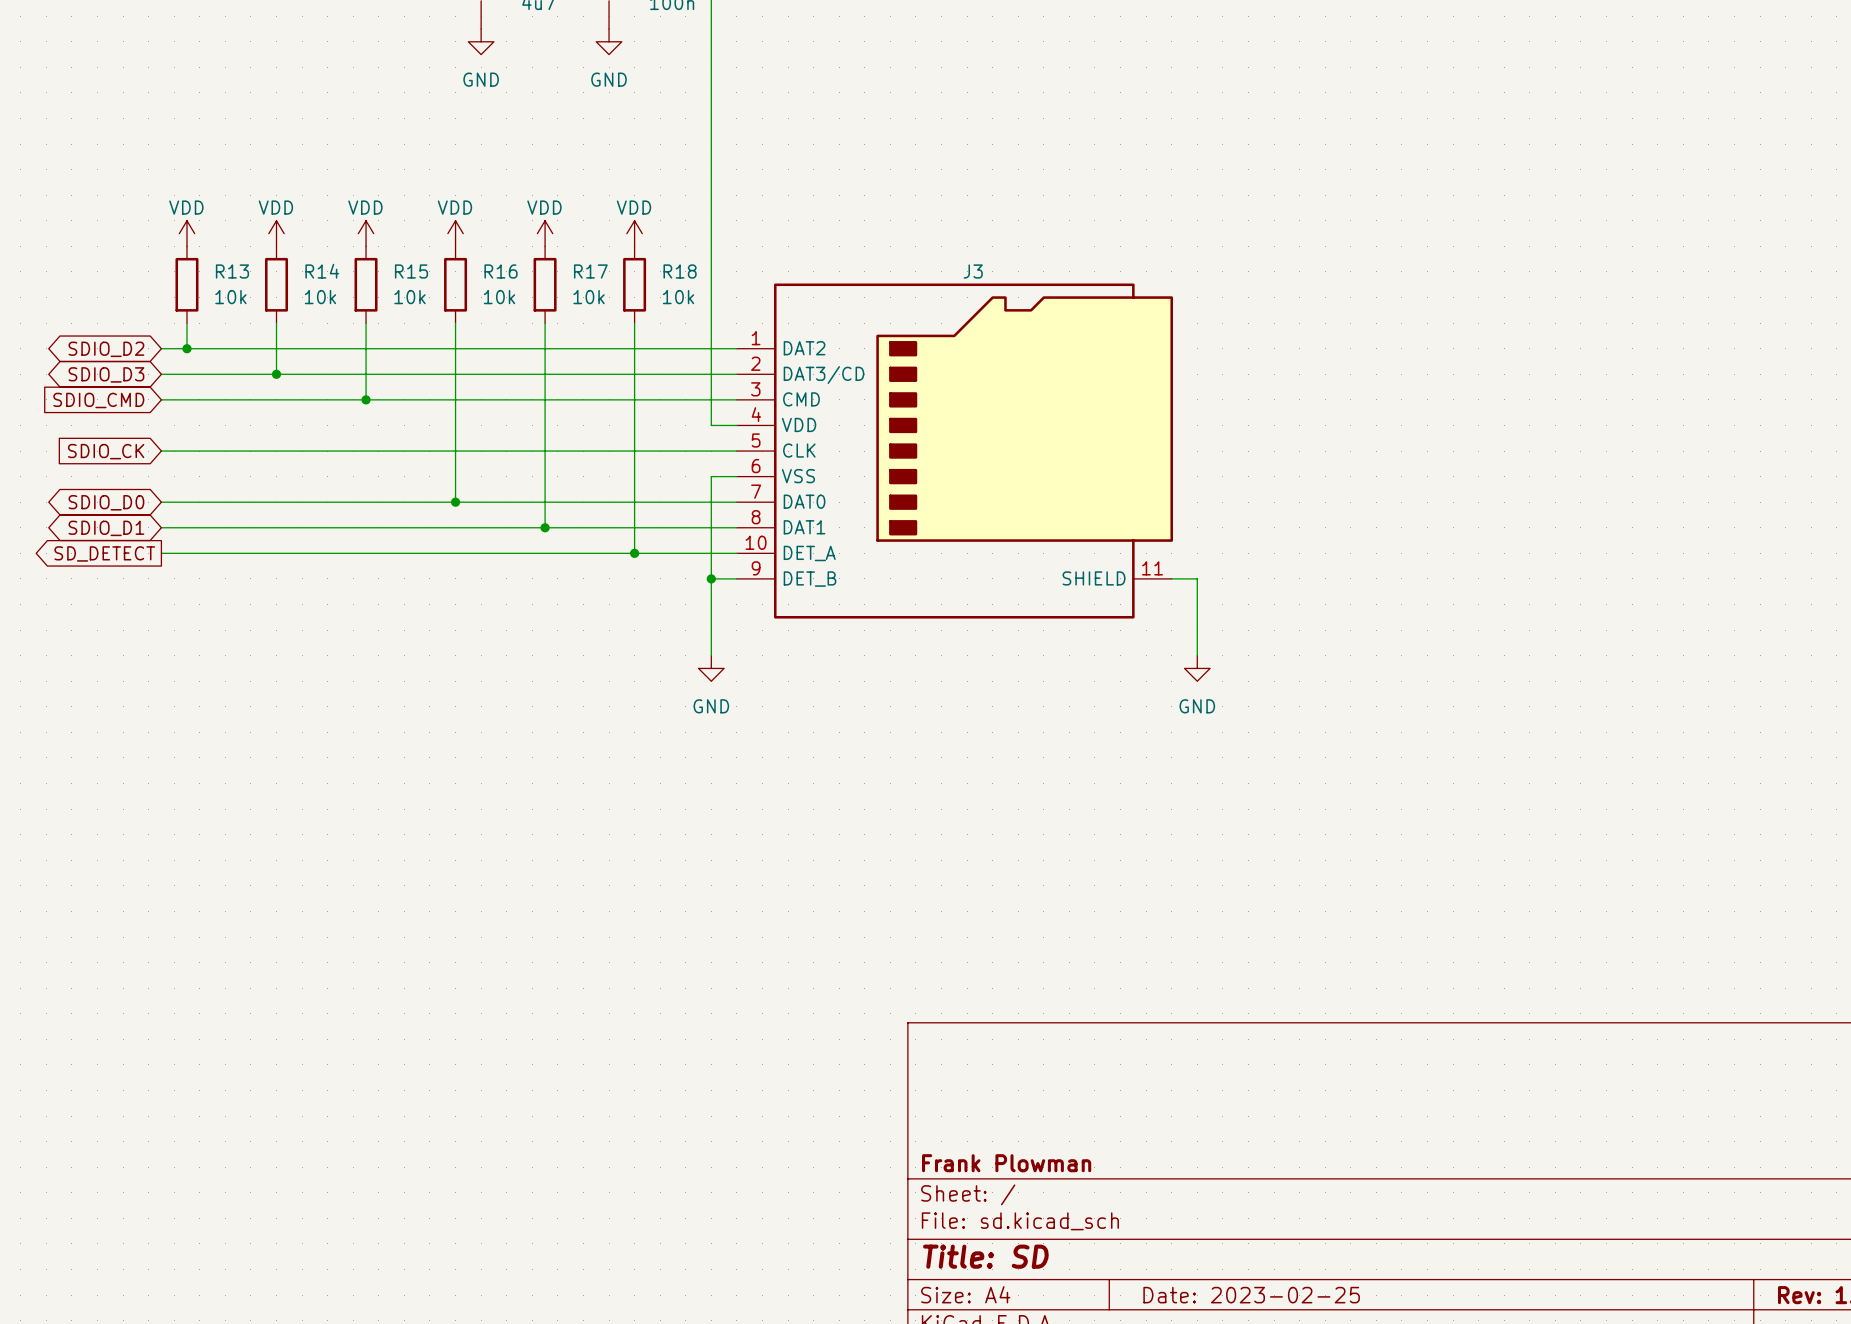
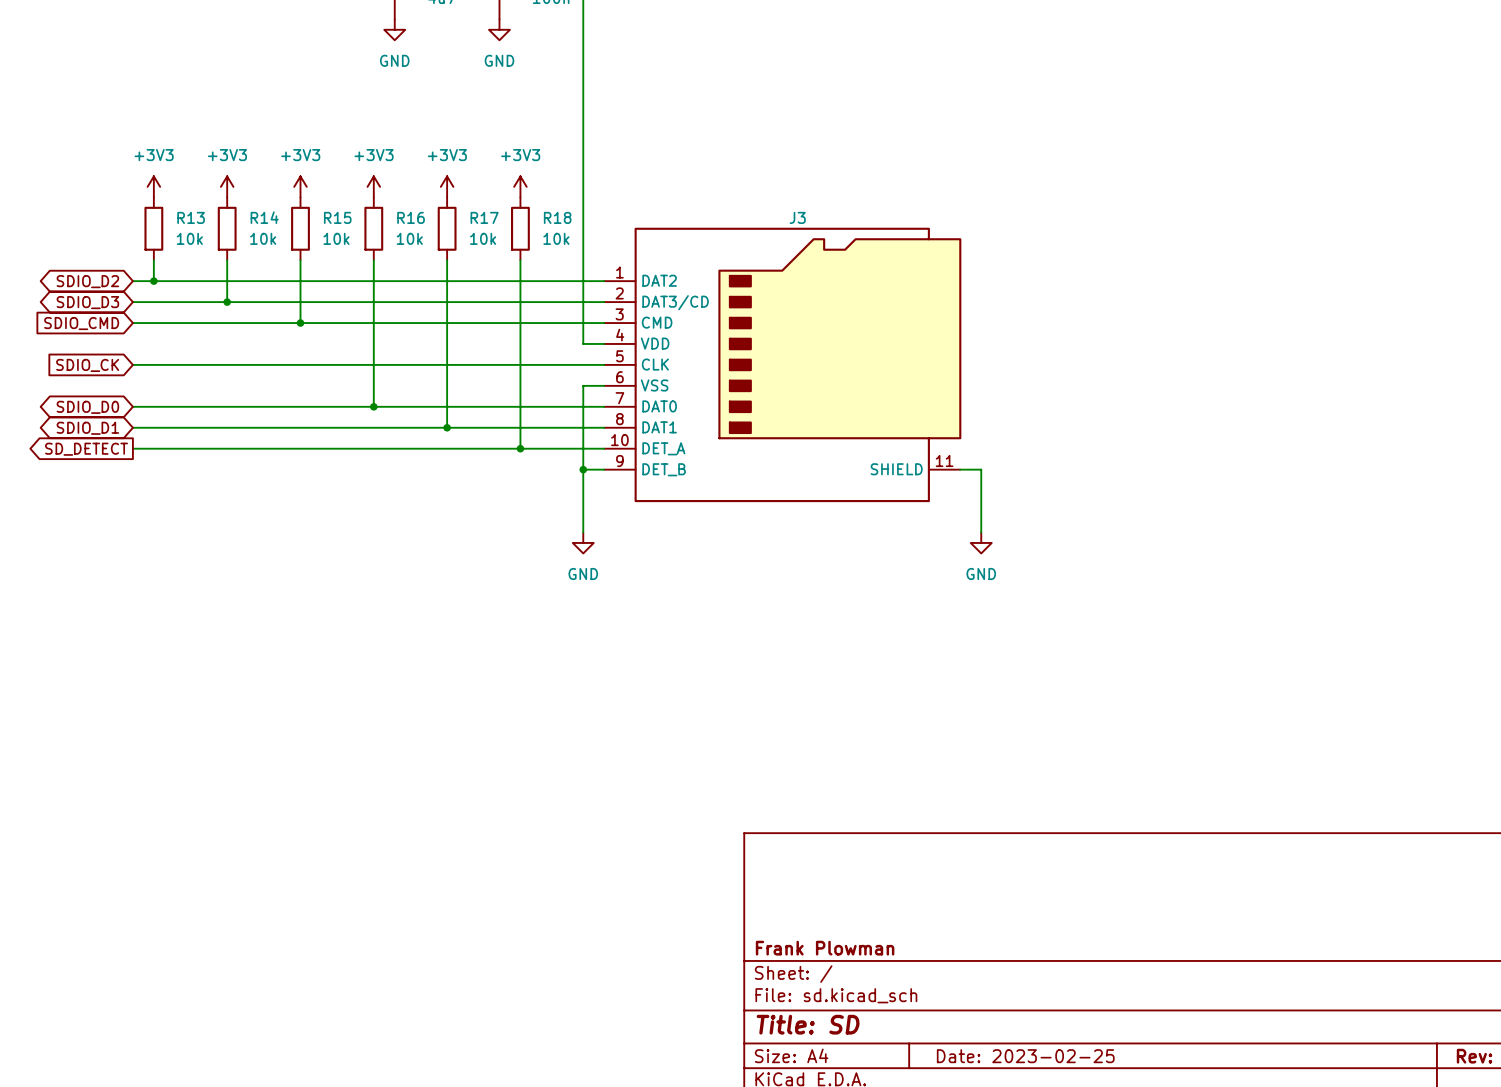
power symbol: VDD (186, 233) -> +3V3 (153, 186)
power symbol: VDD (276, 233) -> +3V3 (227, 186)
power symbol: VDD (366, 233) -> +3V3 (300, 186)
power symbol: VDD (455, 233) -> +3V3 (373, 186)
power symbol: VDD (545, 233) -> +3V3 (447, 186)
power symbol: VDD (634, 233) -> +3V3 (520, 186)

